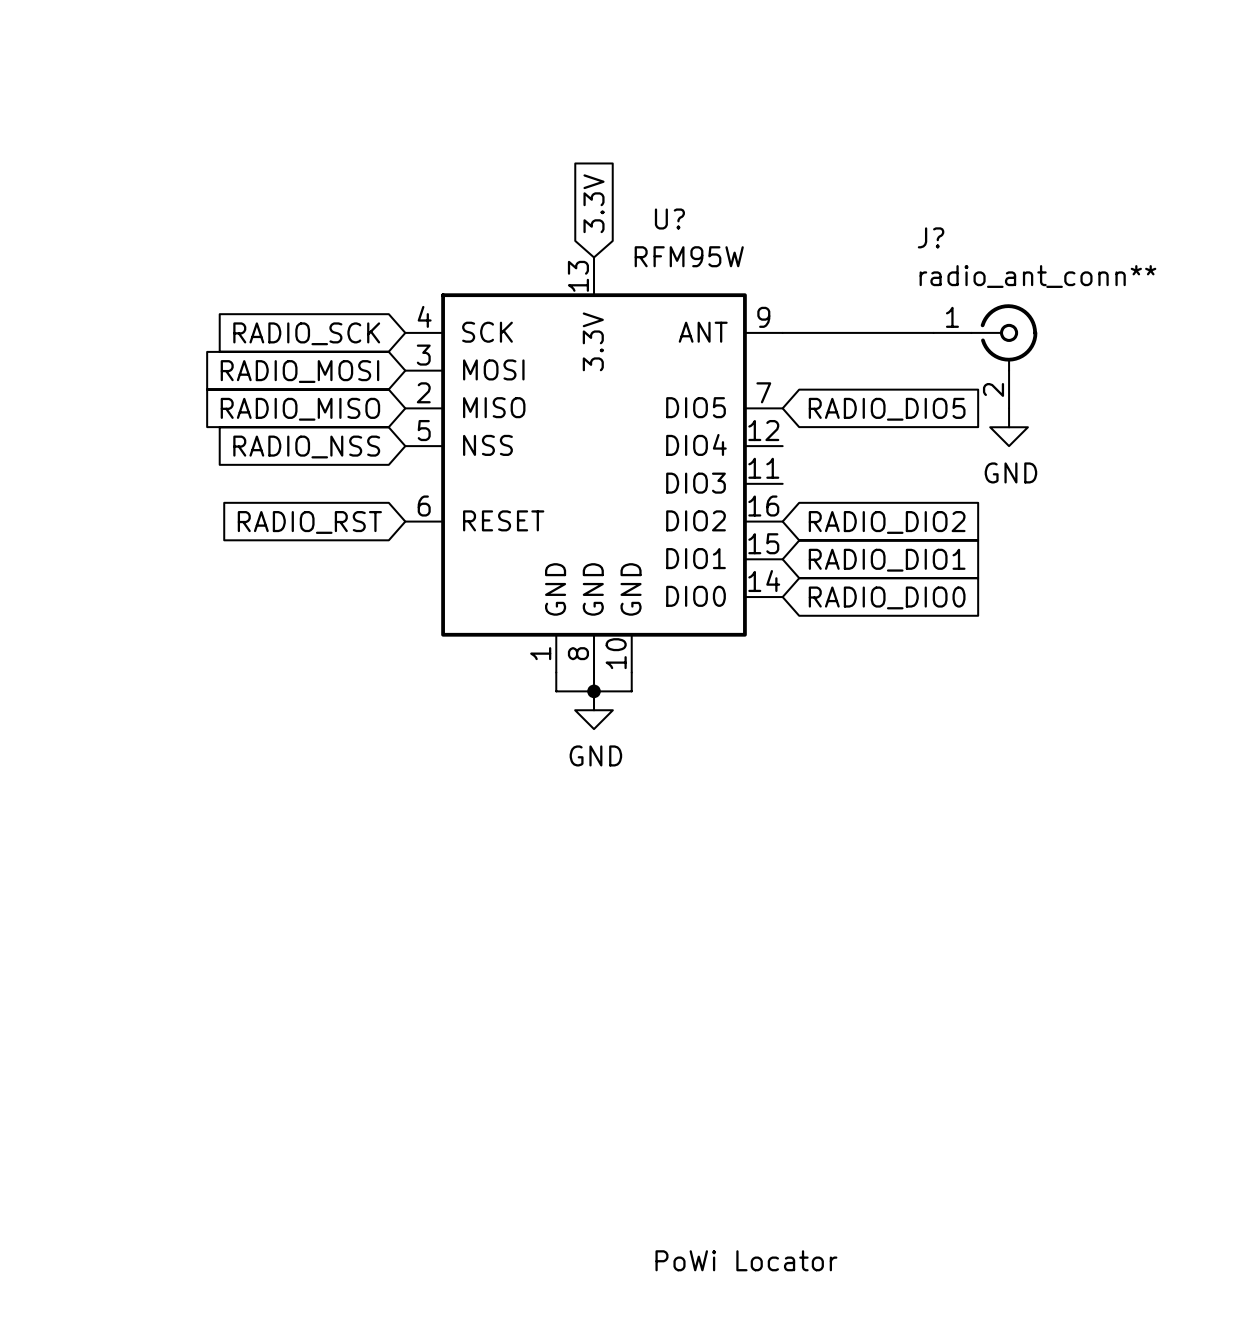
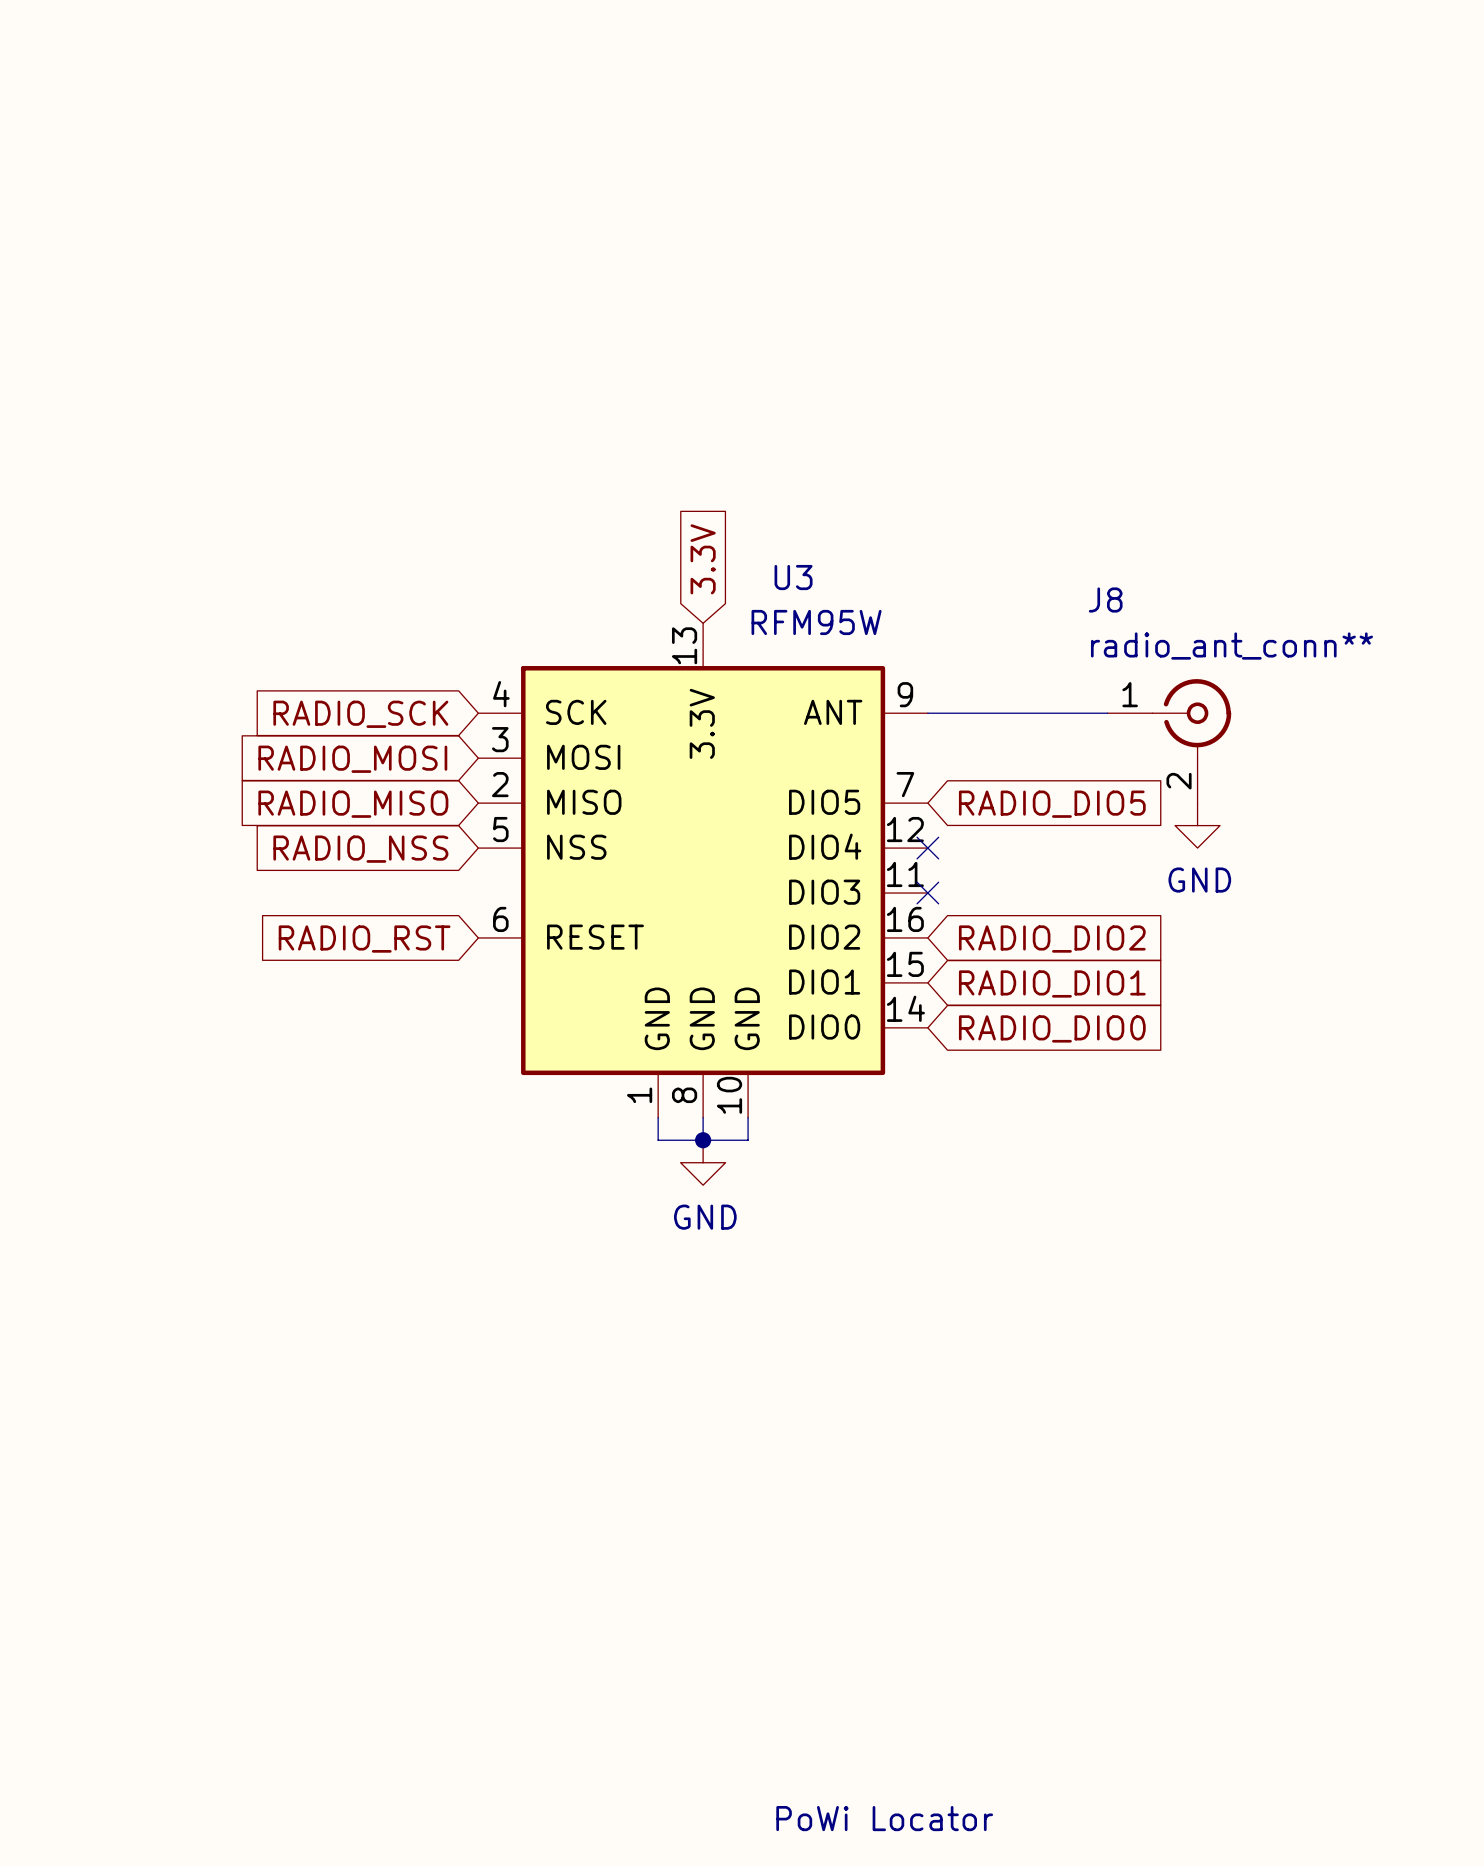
U? name: U? (669, 219) -> U3 (793, 577)
J? name: J? (931, 237) -> J8 (1105, 600)
no-connect mark: none -> (927, 848)
no-connect mark: none -> (927, 893)

